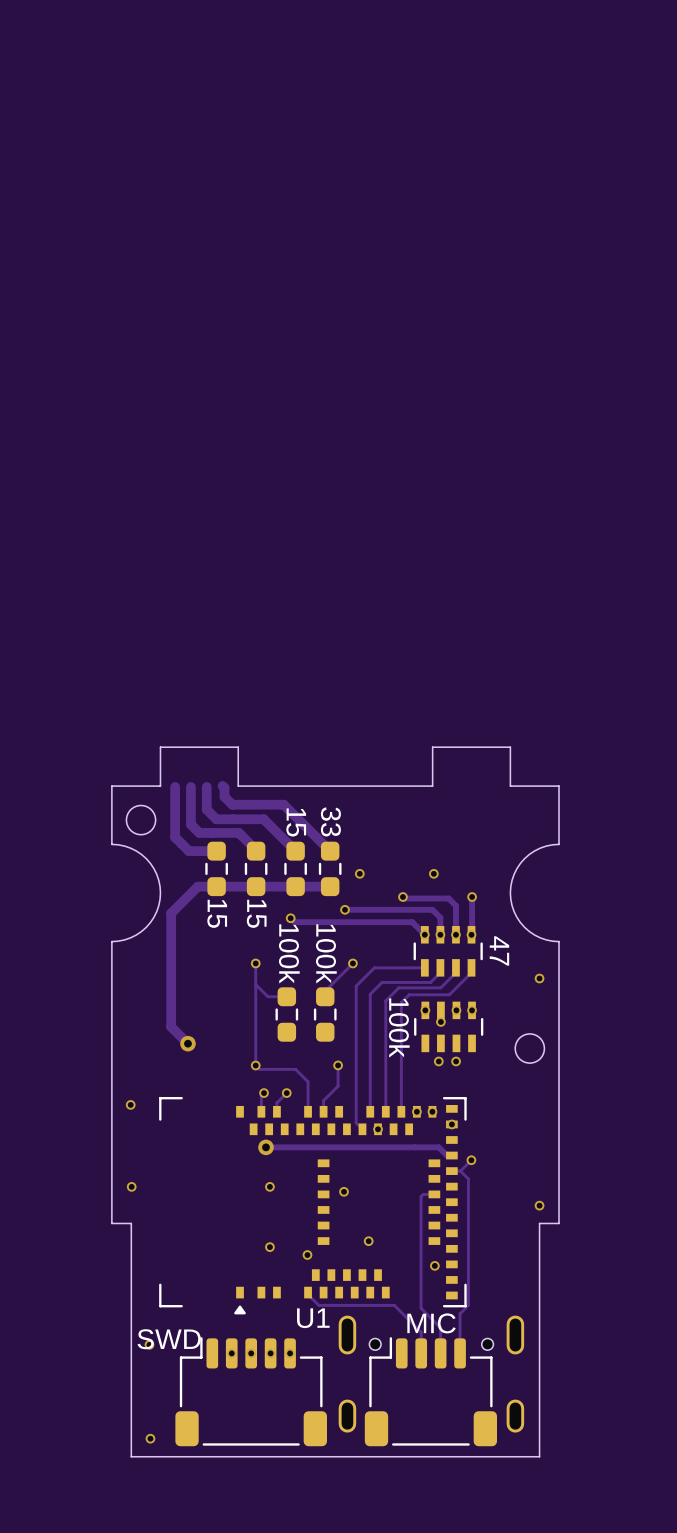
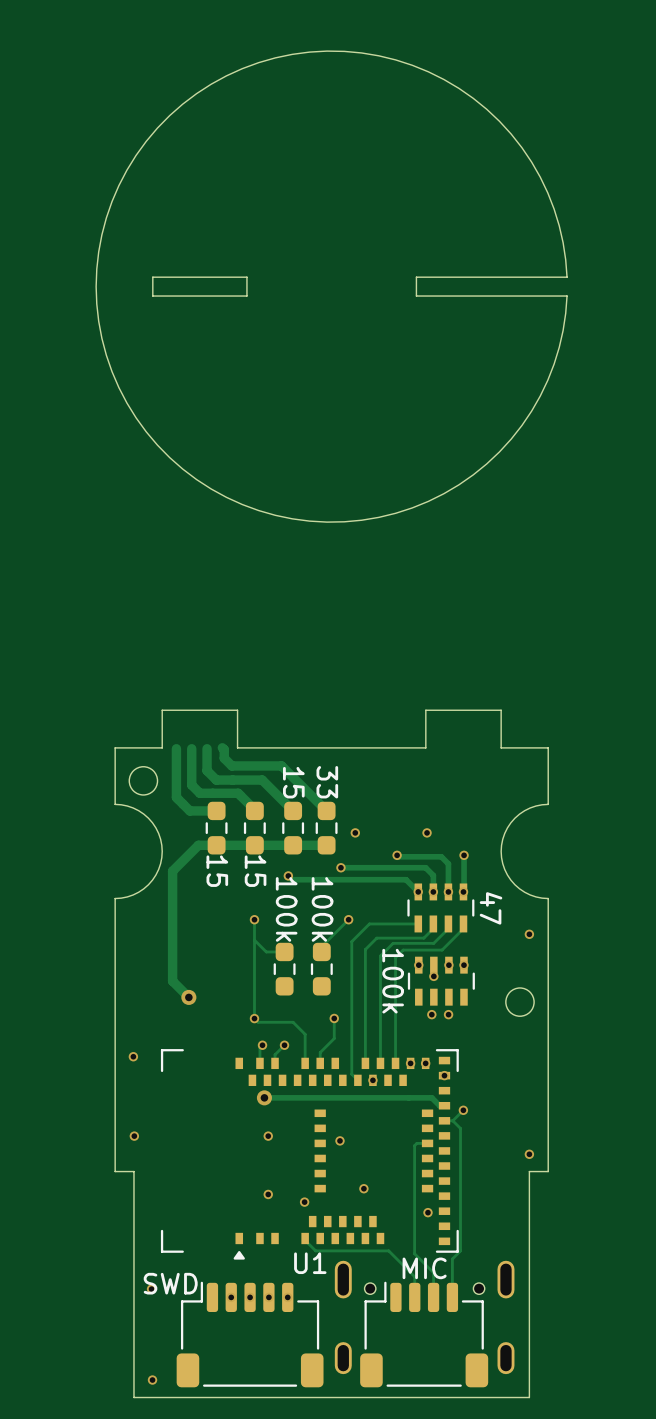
board edge: none -> (246, 277) (152, 277) (152, 296) (246, 296) (246, 277)
board edge: none -> (567, 277) (416, 277) (416, 296) (567, 296) (559, 347) (547, 380) (531, 411) (499, 452) (473, 474) (443, 493) (412, 507) (378, 517) (344, 521) (292, 518) (258, 510) (211, 489) (169, 457) (136, 417) (118, 387) (101, 338) (96, 303) (96, 269) (106, 218) (118, 185) (146, 141) (182, 104) (226, 75) (258, 62) (309, 52) (361, 52) (395, 59) (443, 79) (486, 109) (511, 134) (540, 177) (559, 225) (567, 277)

